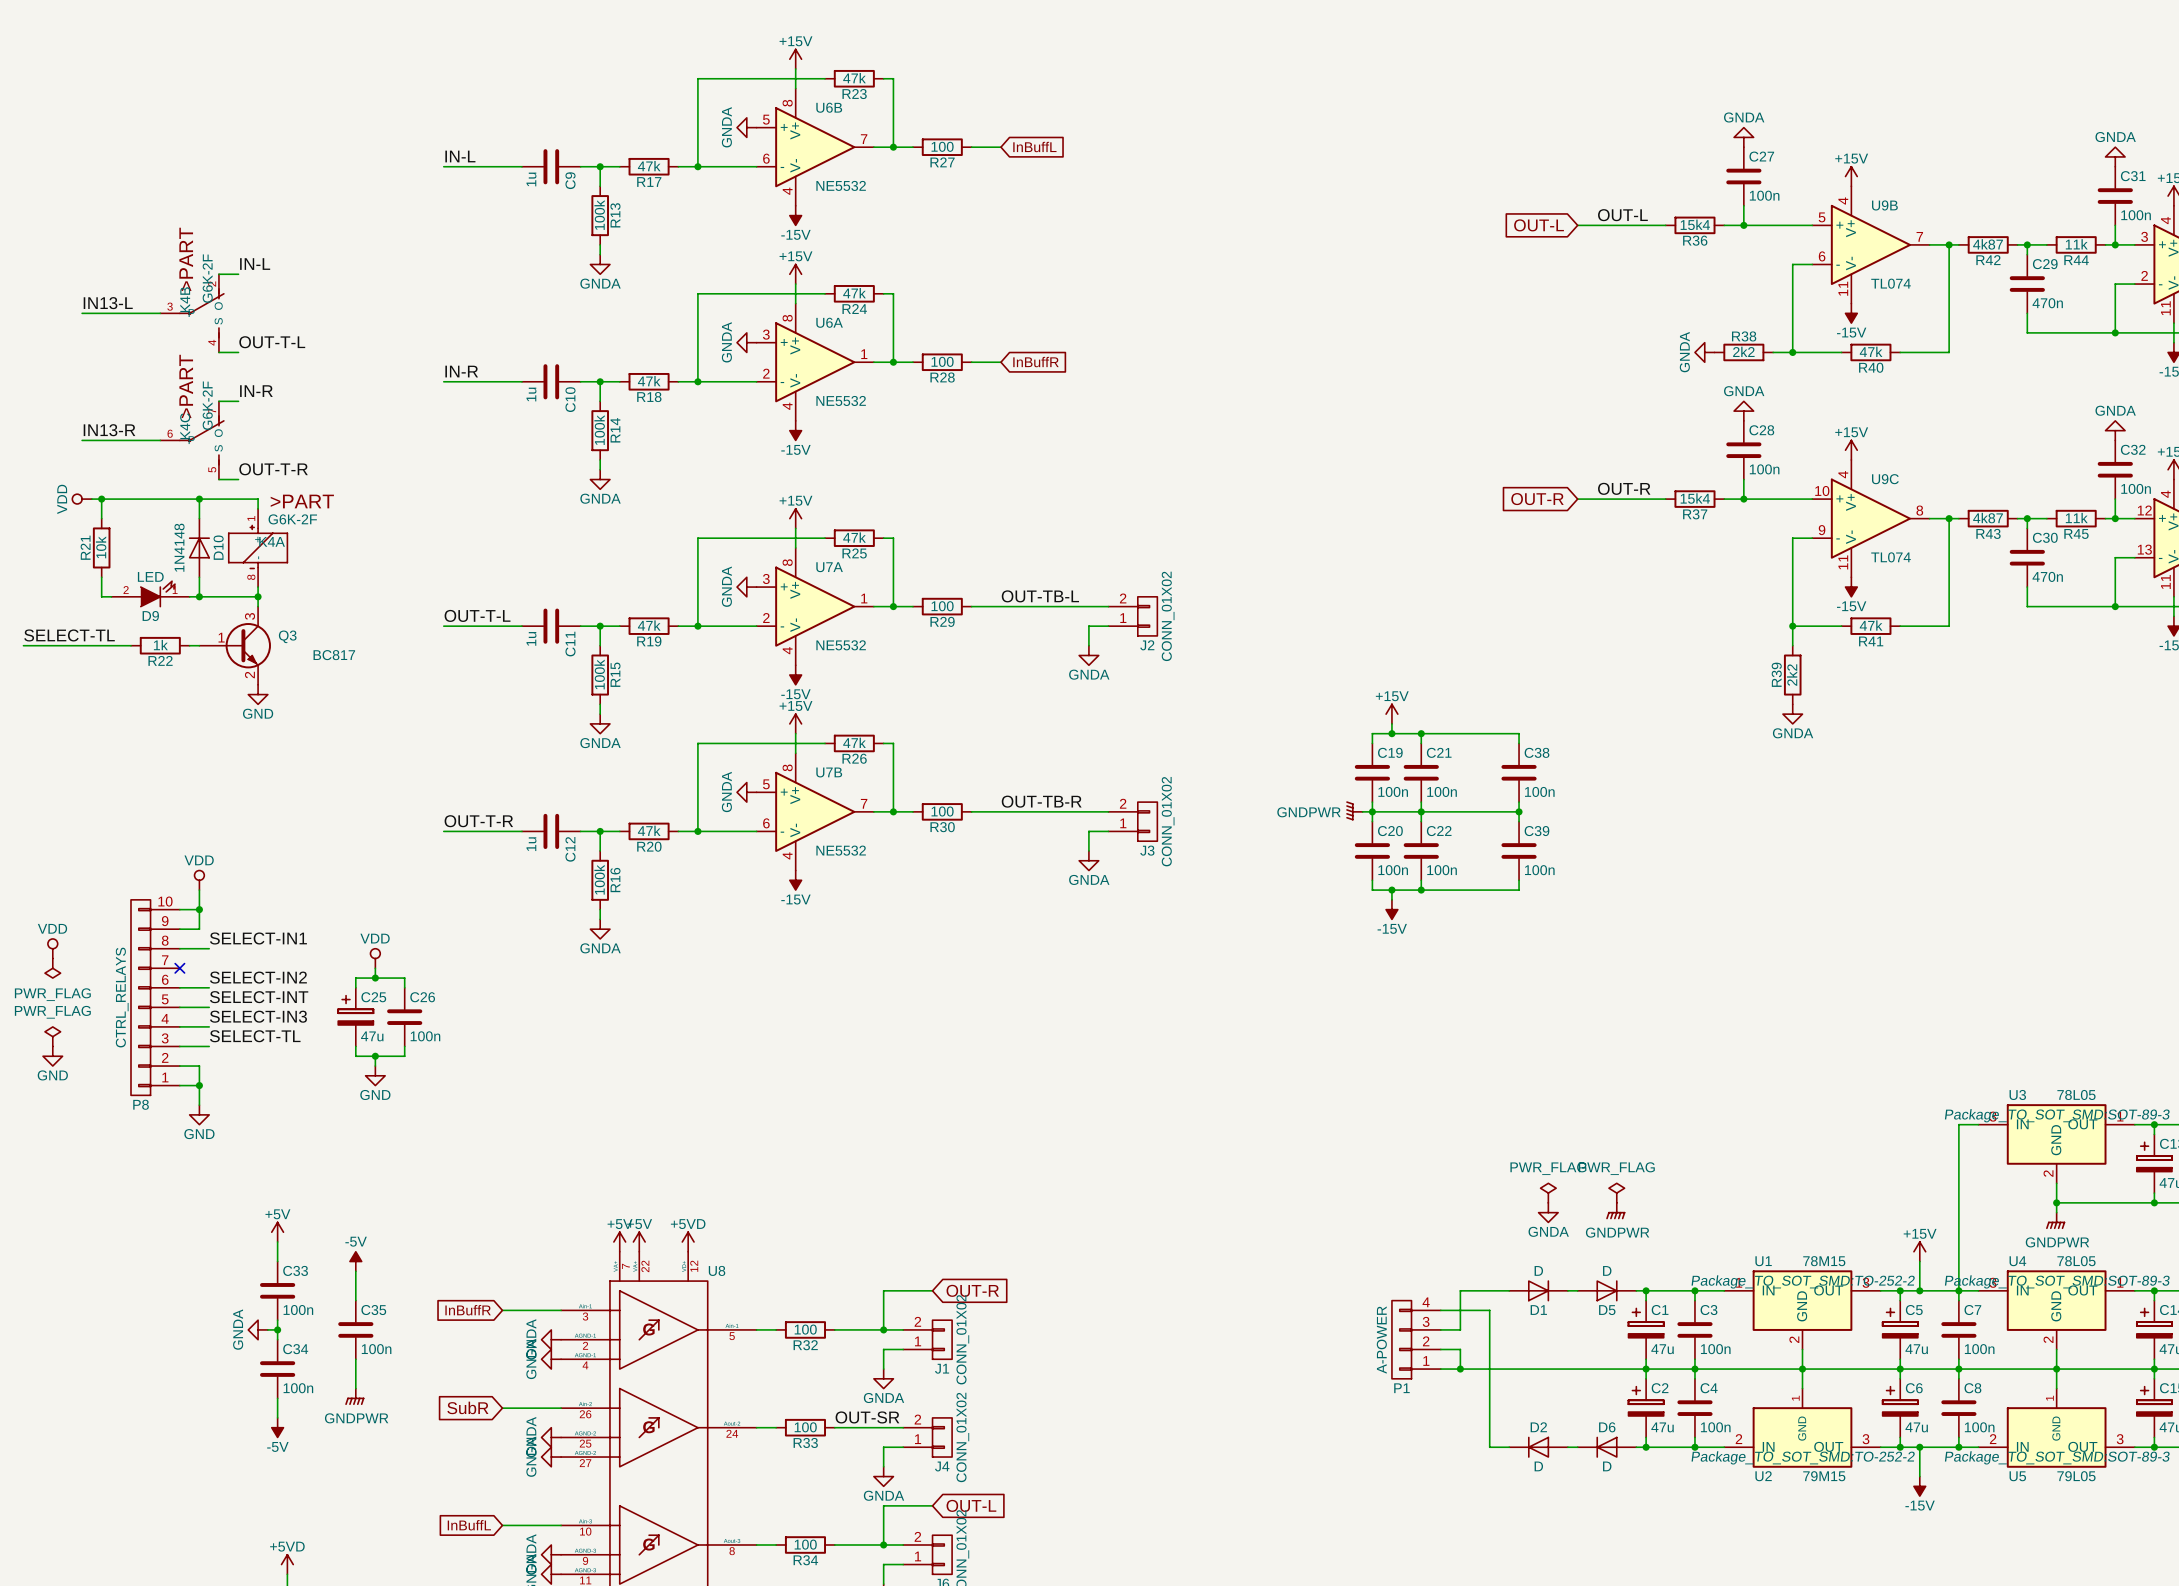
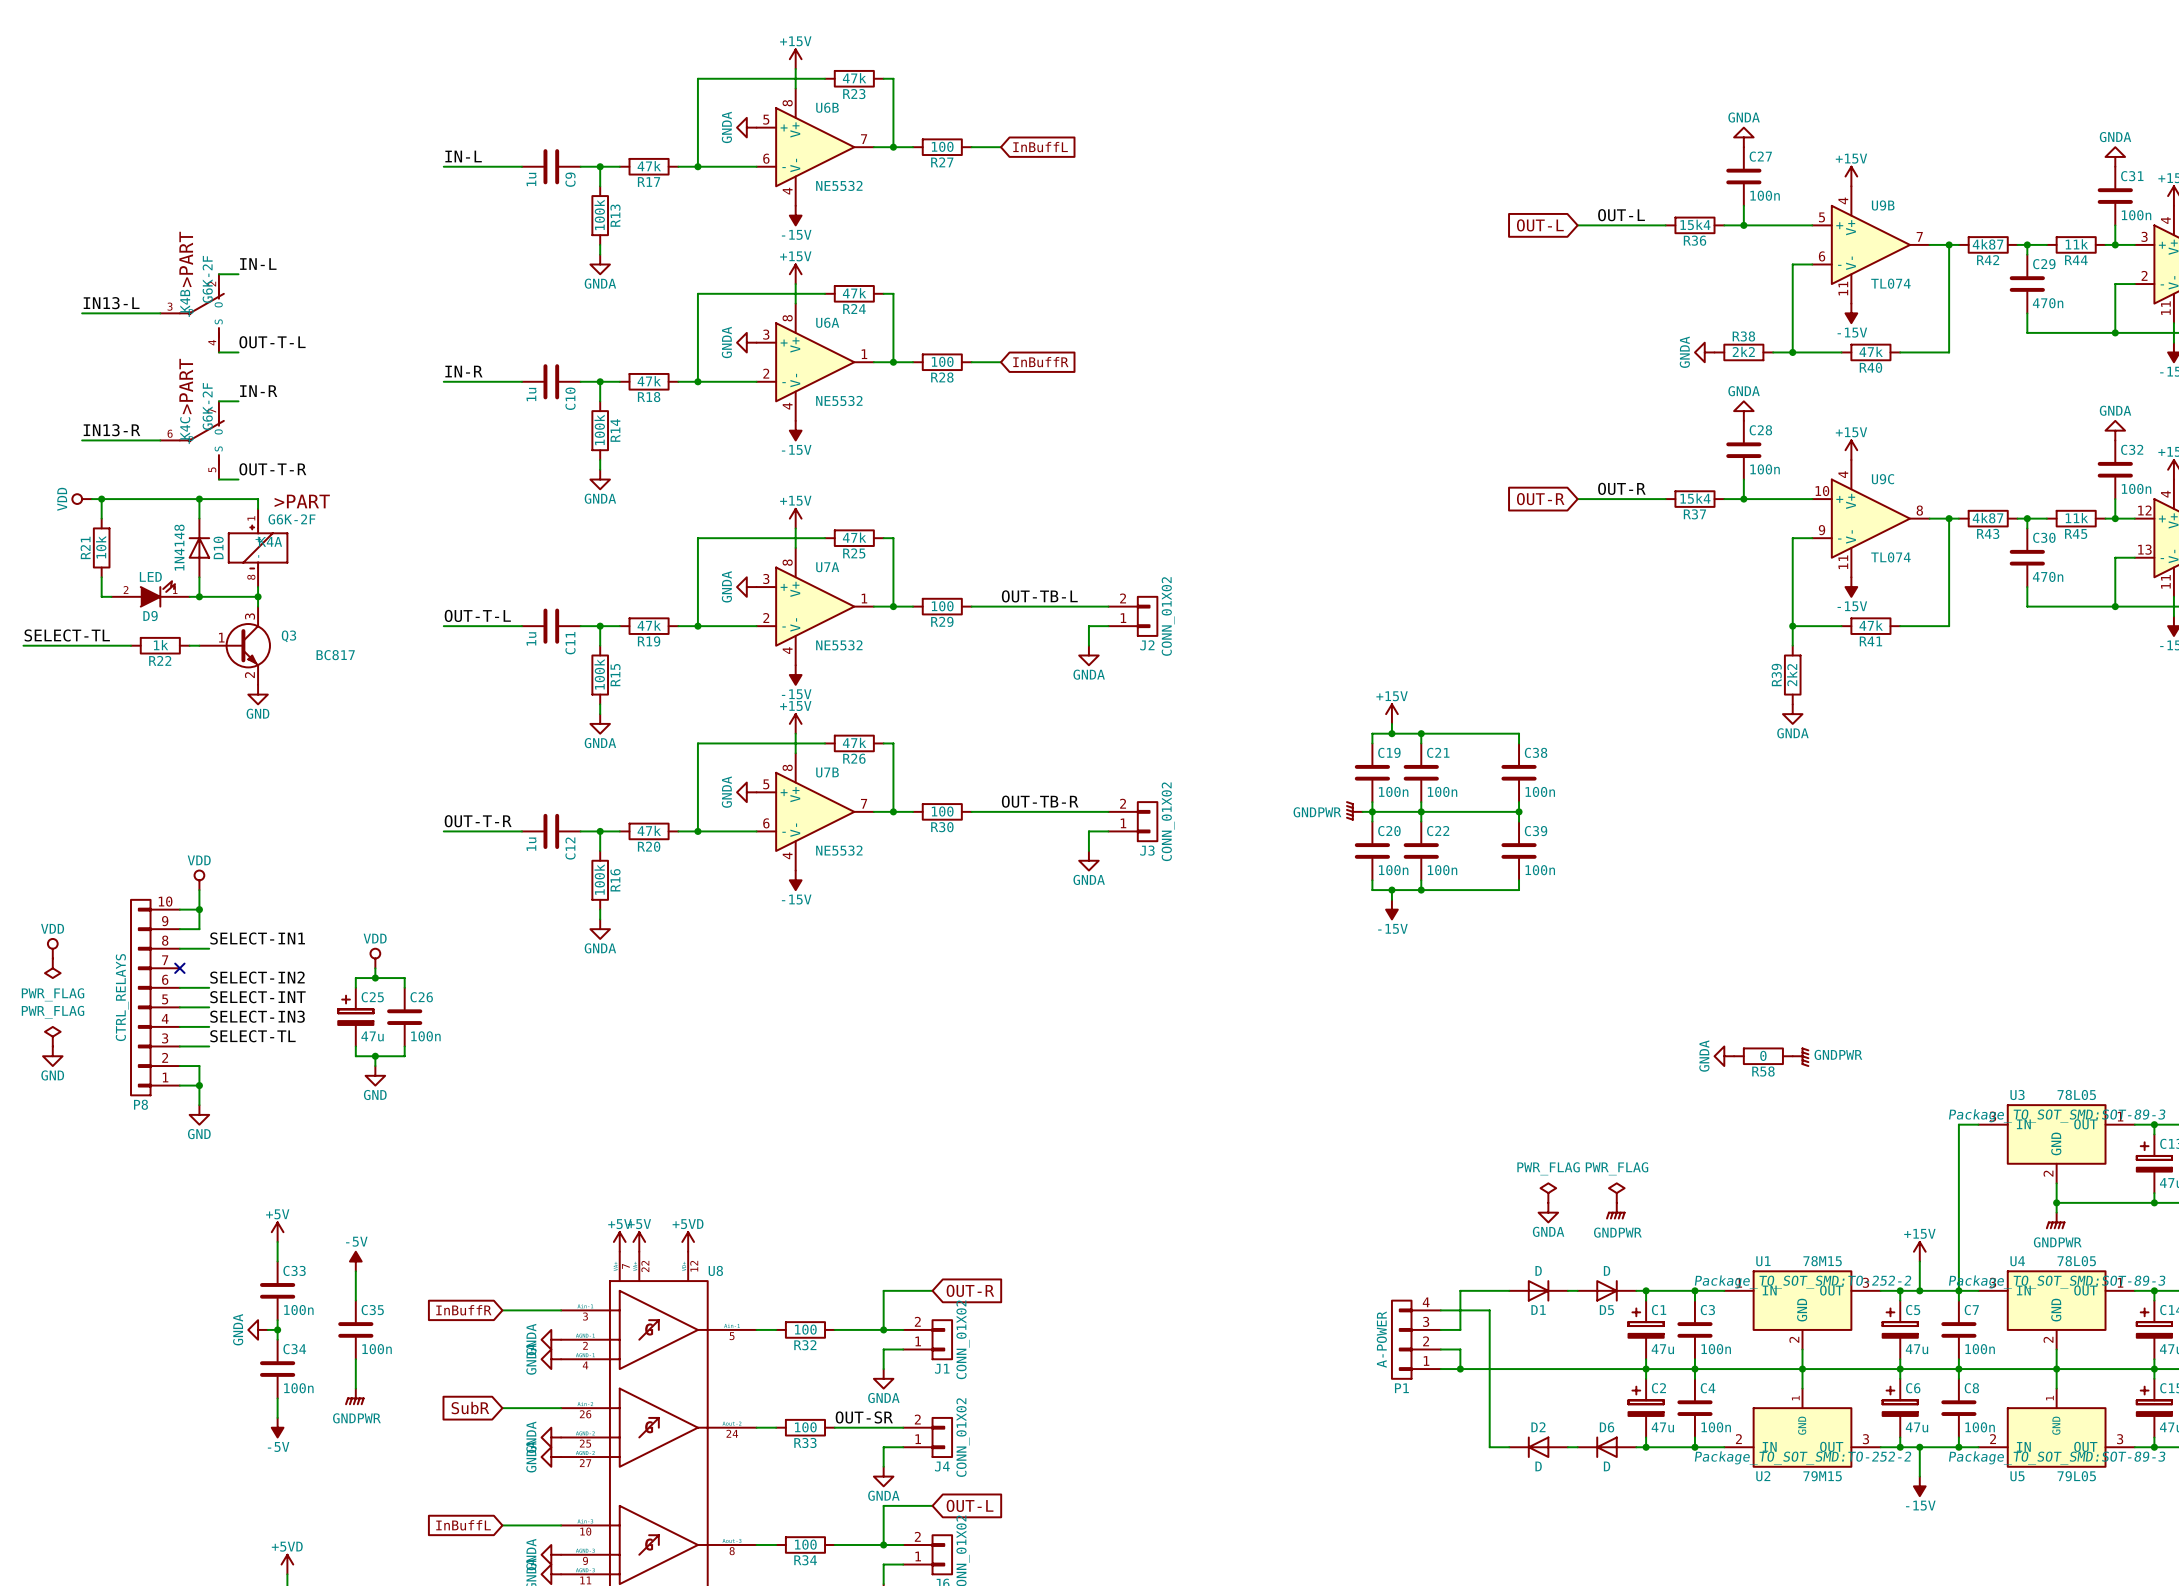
power symbol: none -> GNDA (1724, 1056)
R58: none -> 0 (1763, 1056)
power symbol: none -> GNDPWR (1800, 1057)

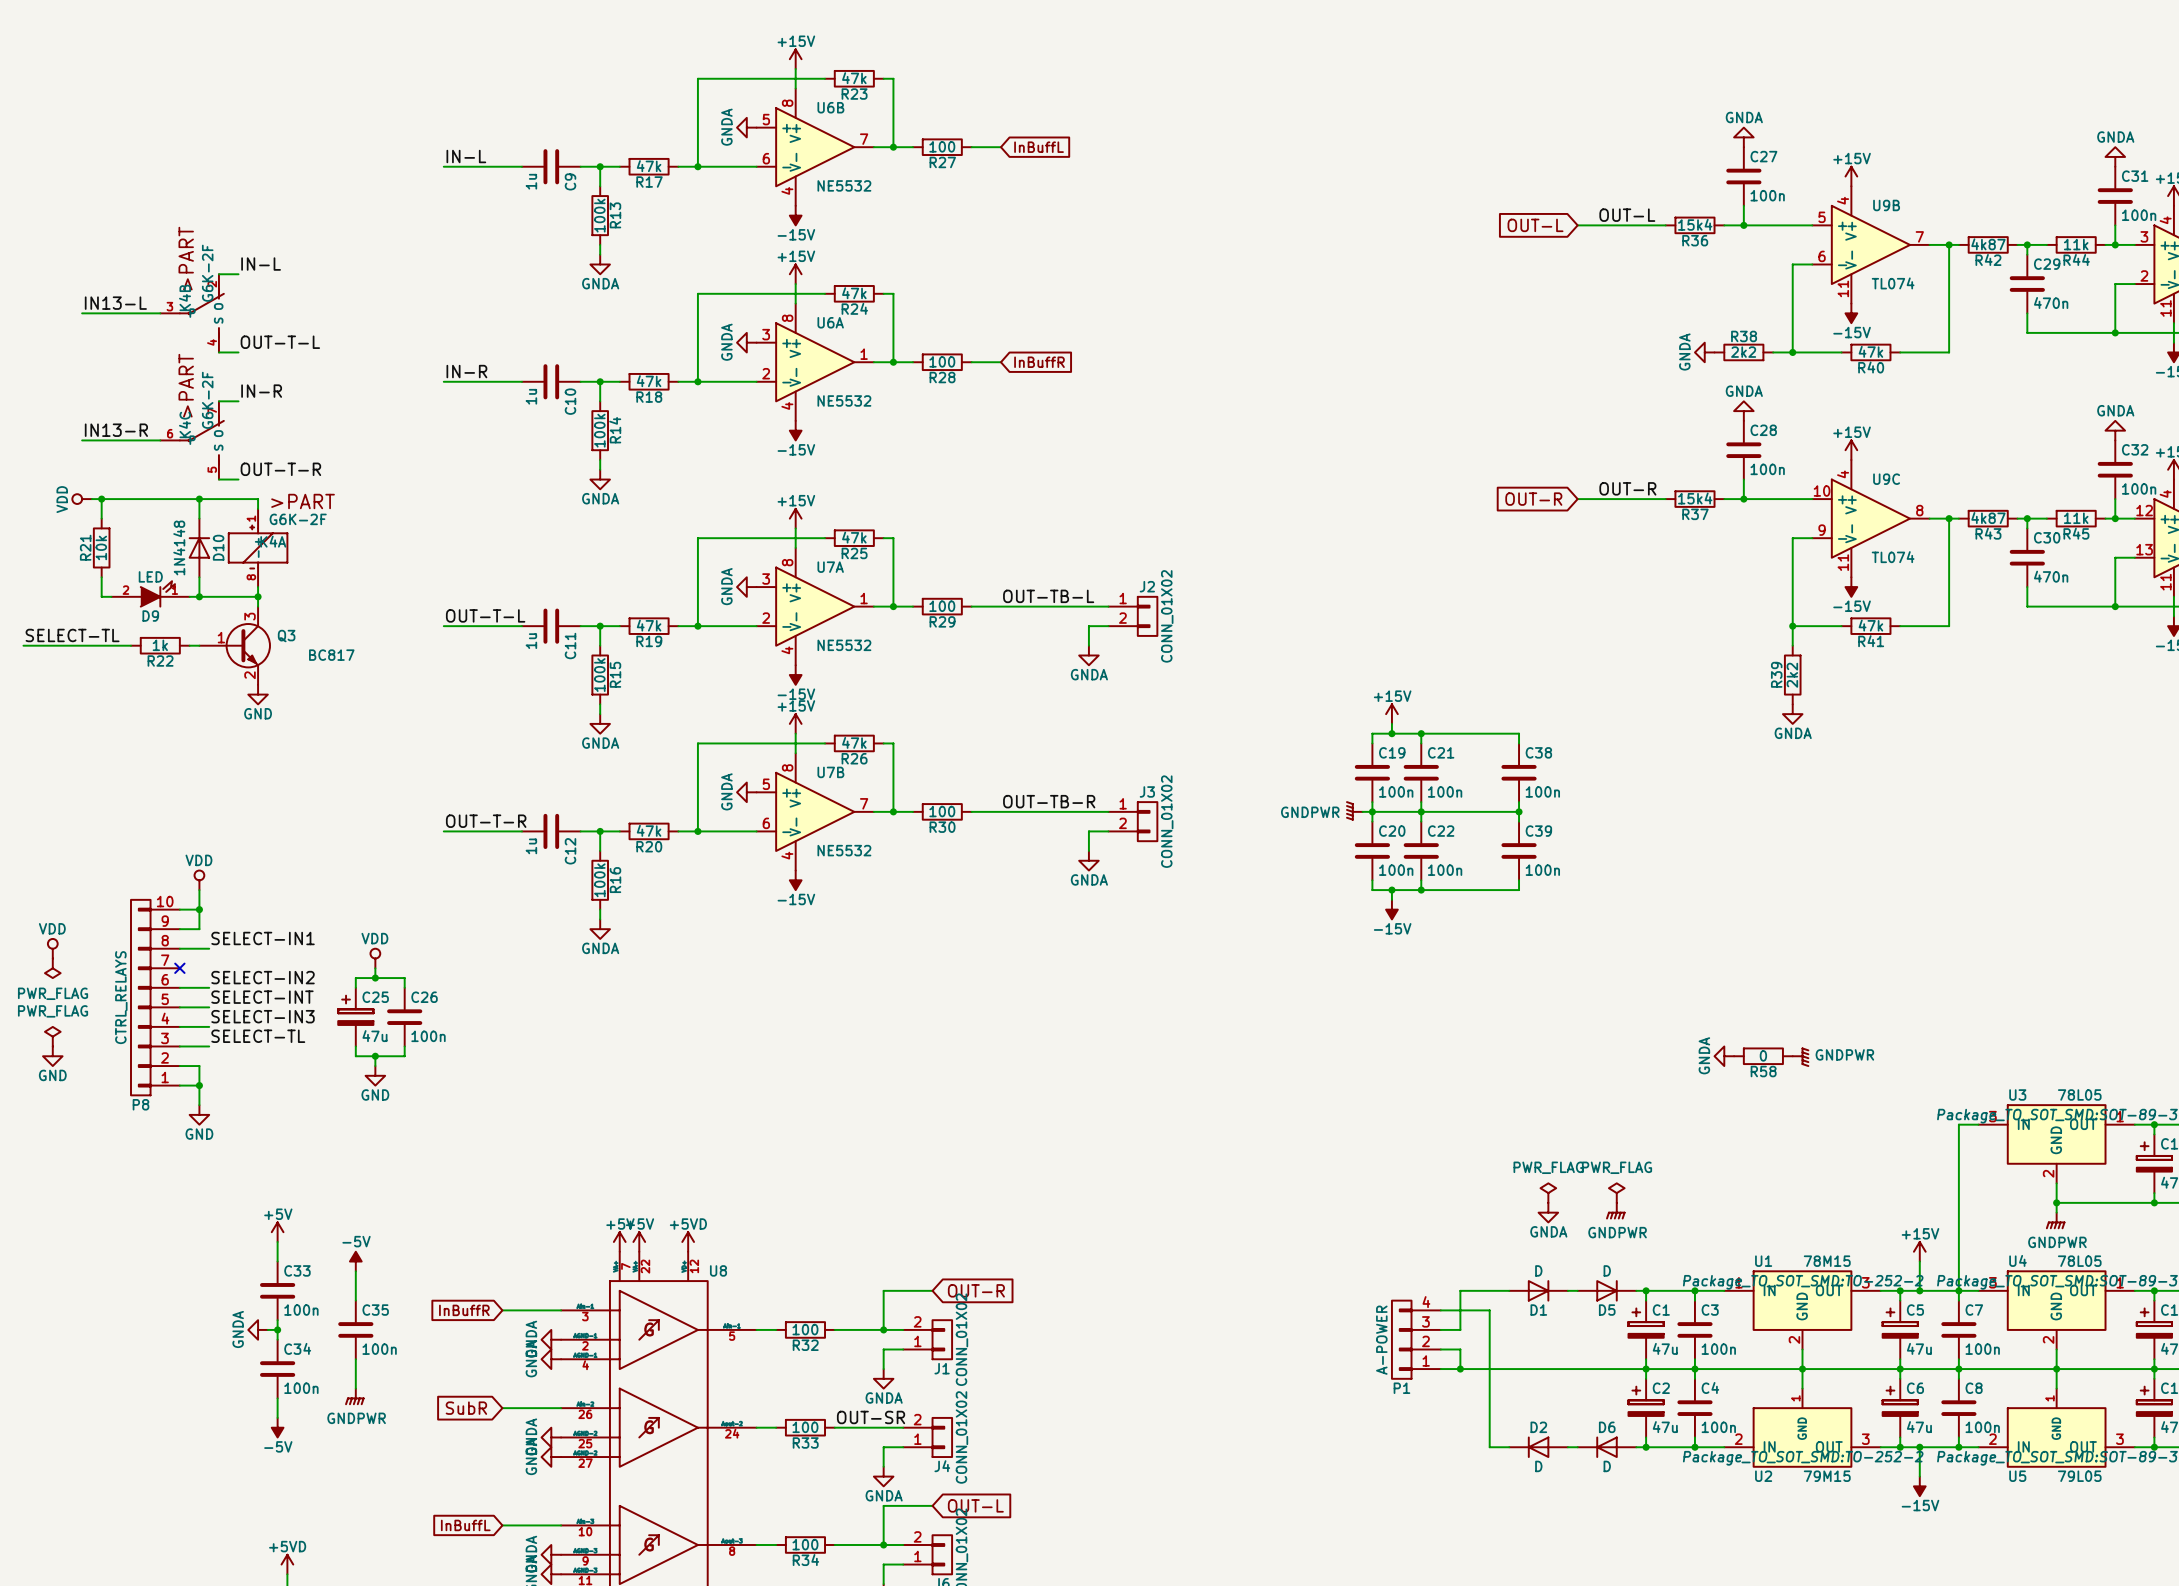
J2 flip: as is (1147, 616) -> up-down (1147, 616)
J3 flip: as is (1147, 821) -> up-down (1147, 821)

